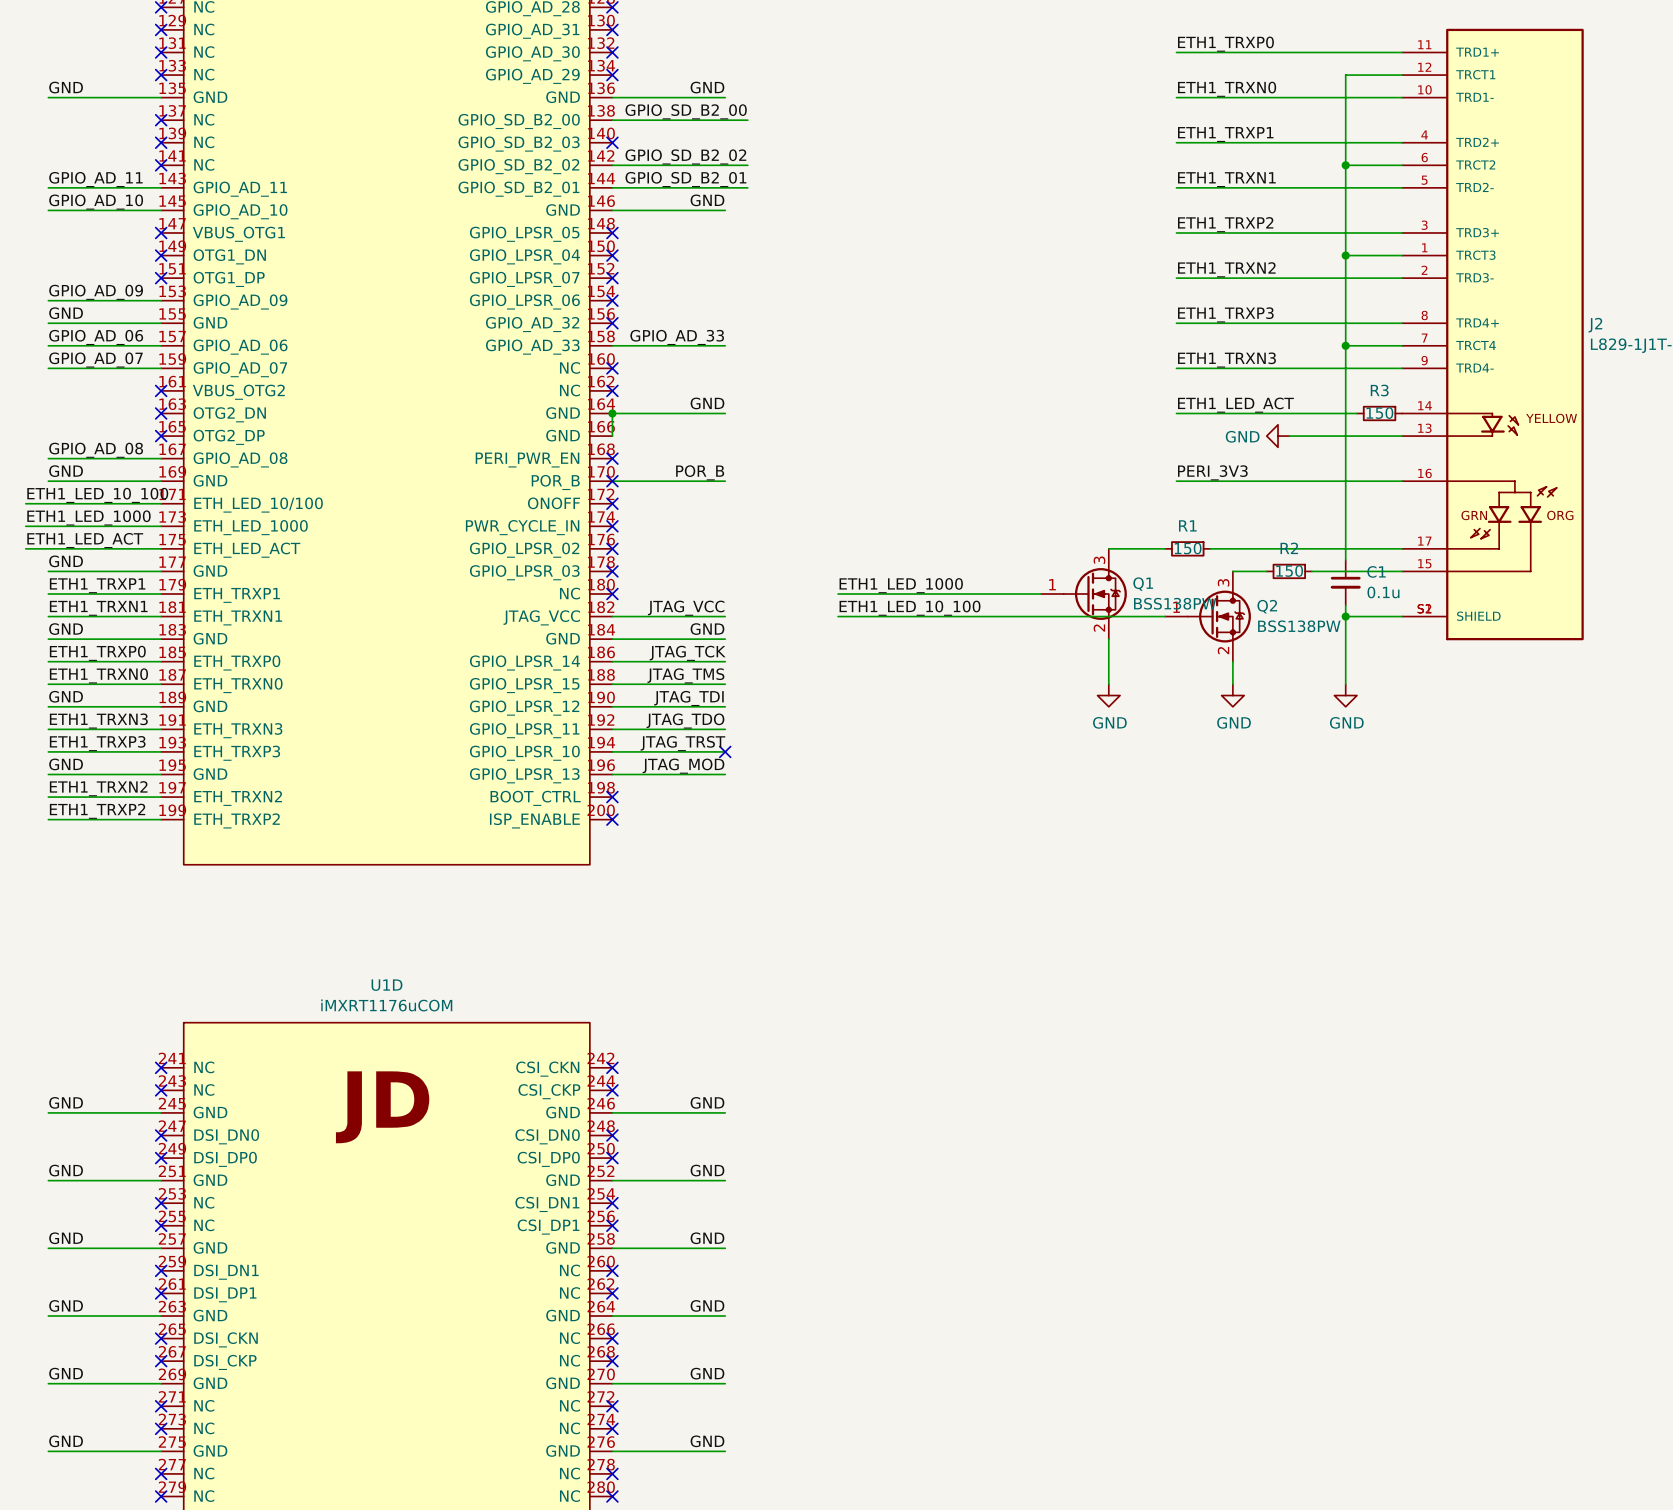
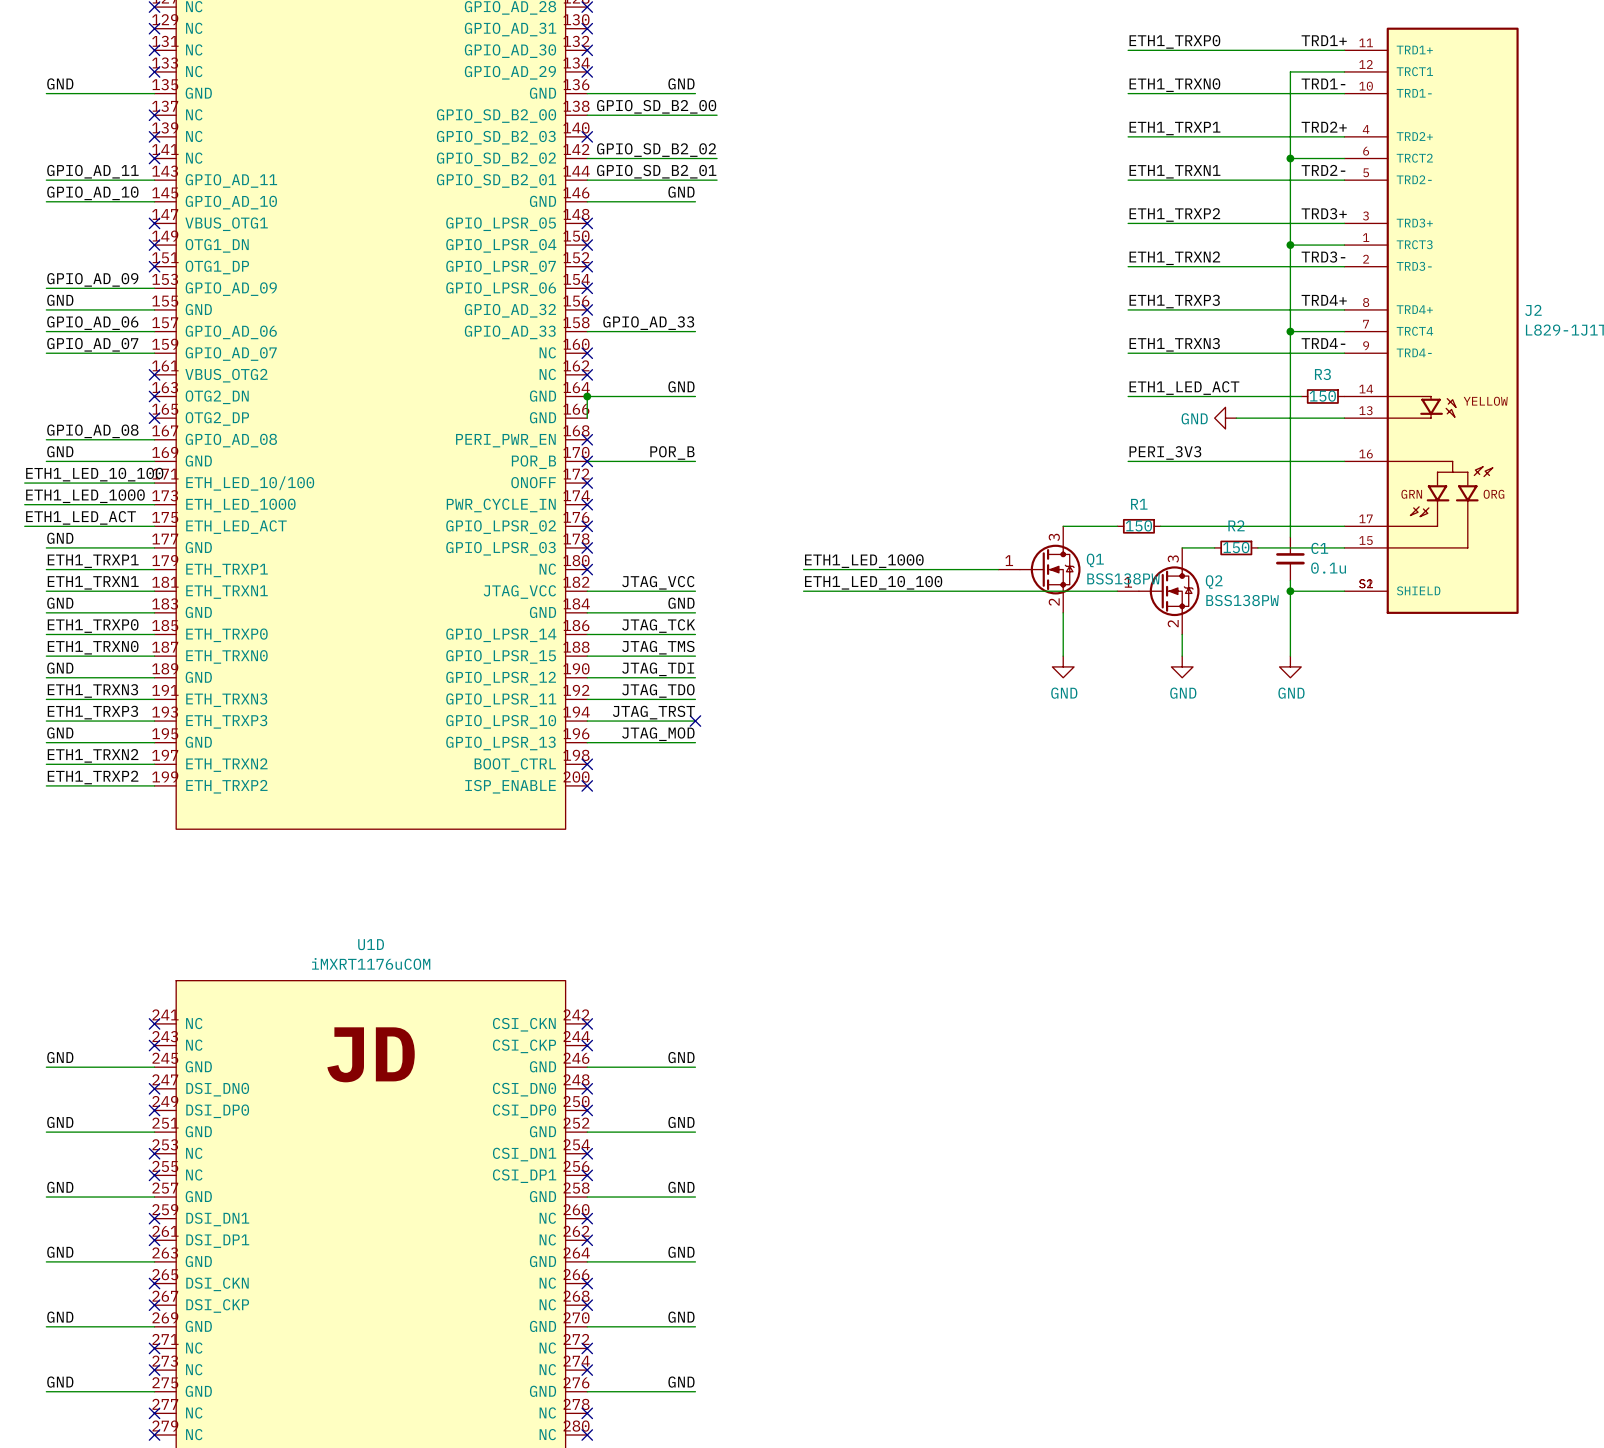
label: none -> TRD1+ (1324, 40)
label: none -> TRD1- (1323, 83)
label: none -> TRD2+ (1324, 127)
label: none -> TRD2- (1323, 170)
label: none -> TRD3+ (1324, 213)
label: none -> TRD3- (1323, 257)
label: none -> TRD4+ (1324, 300)
label: none -> TRD4- (1323, 343)

